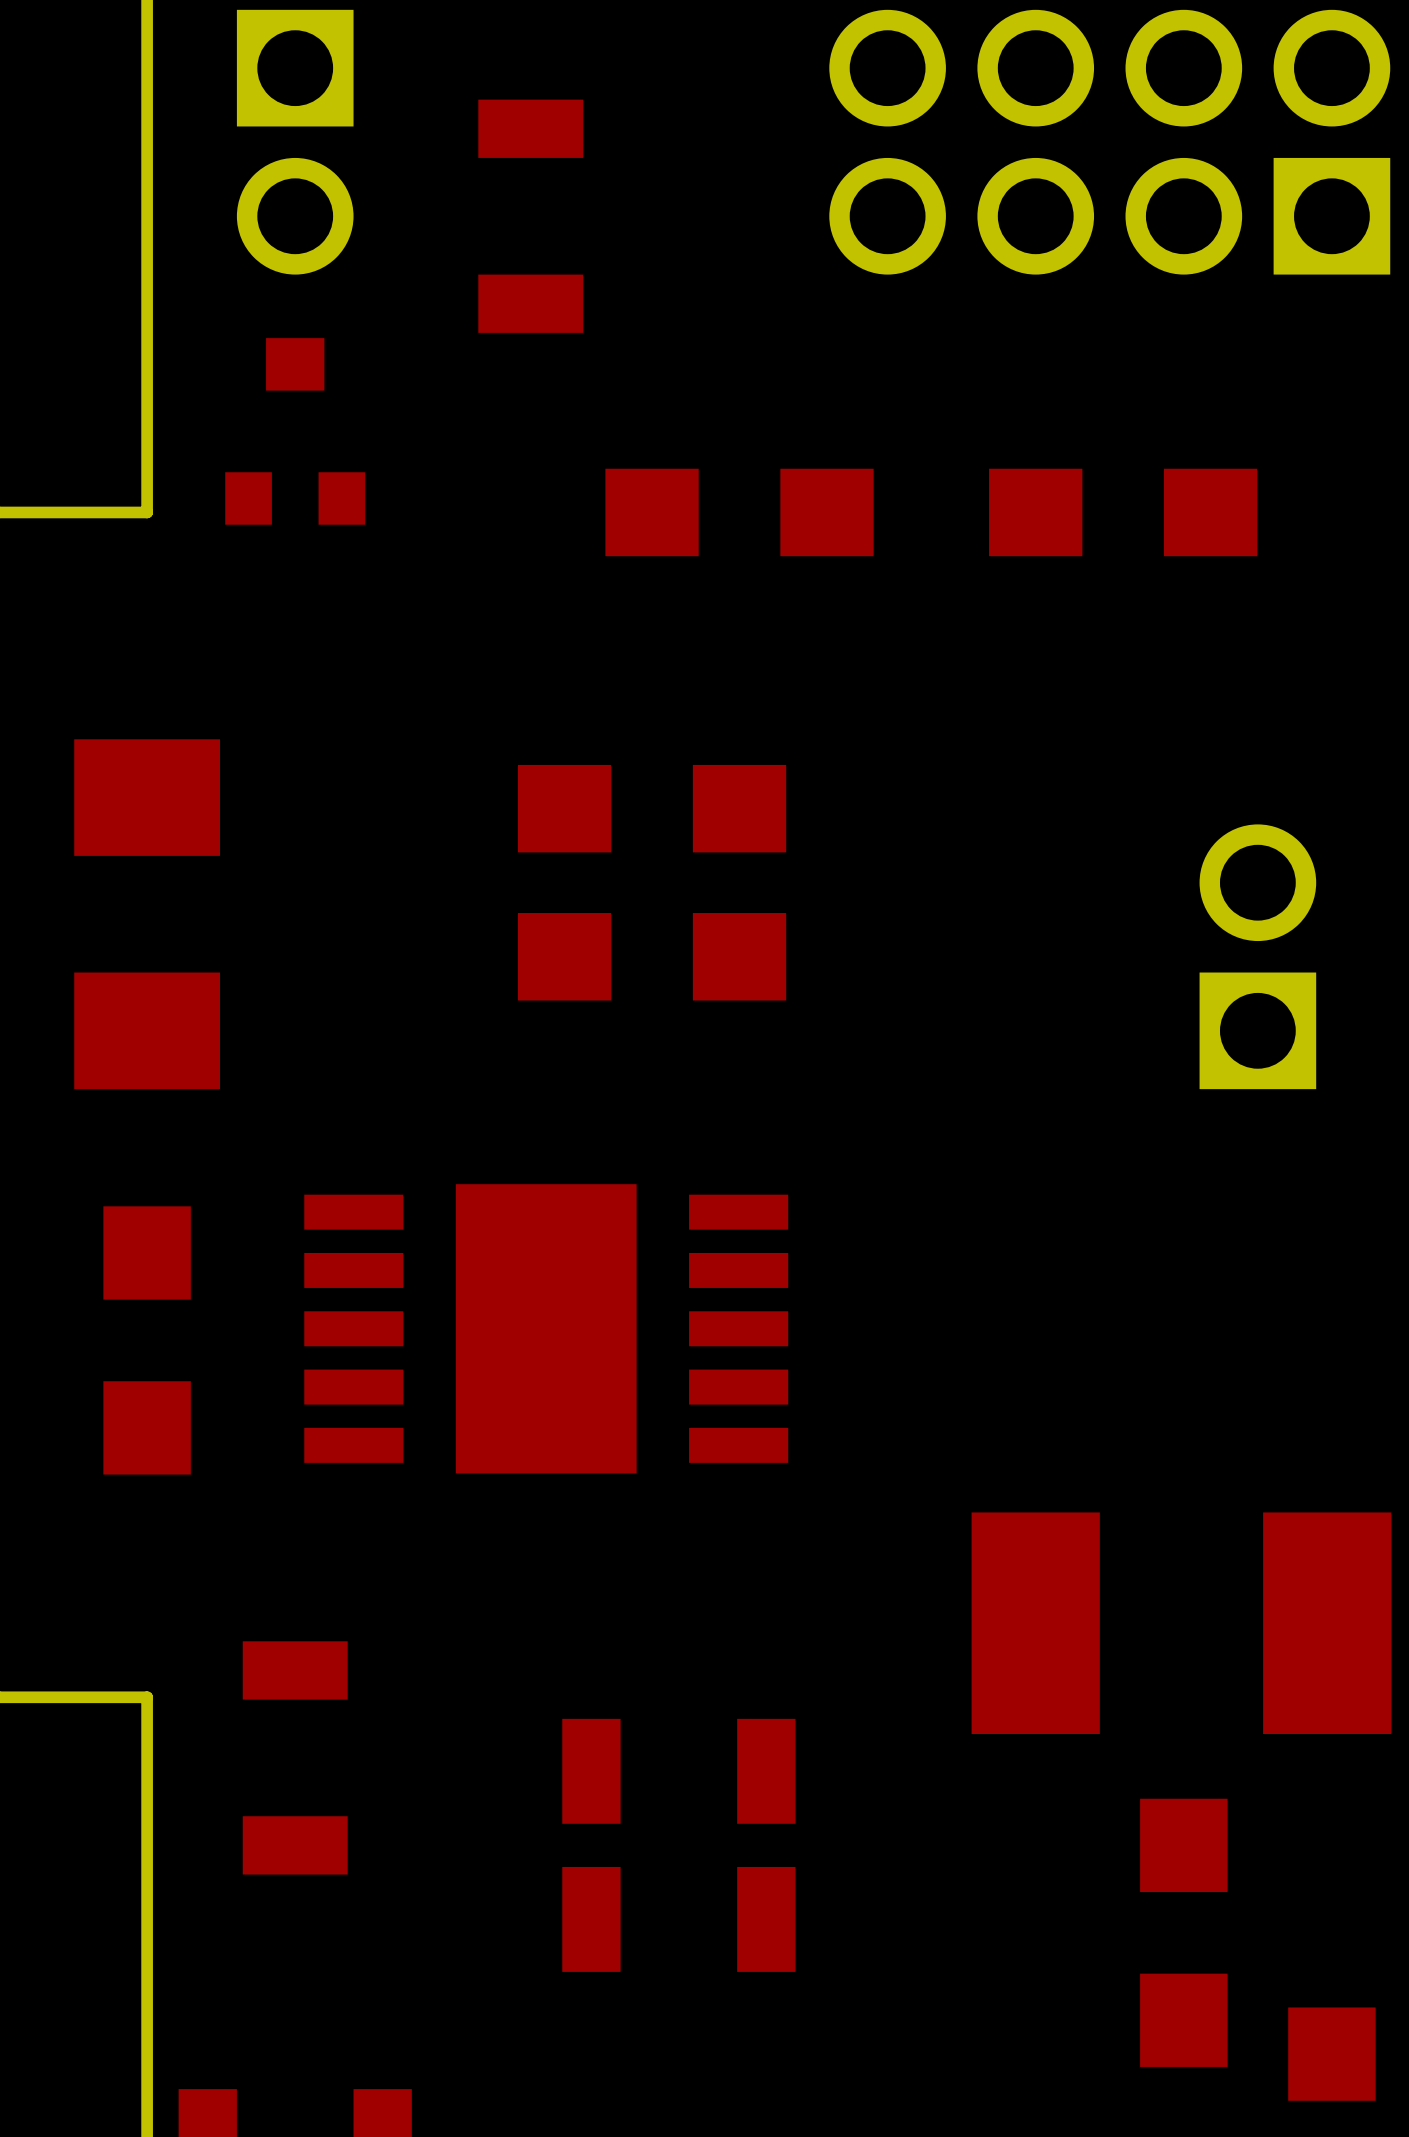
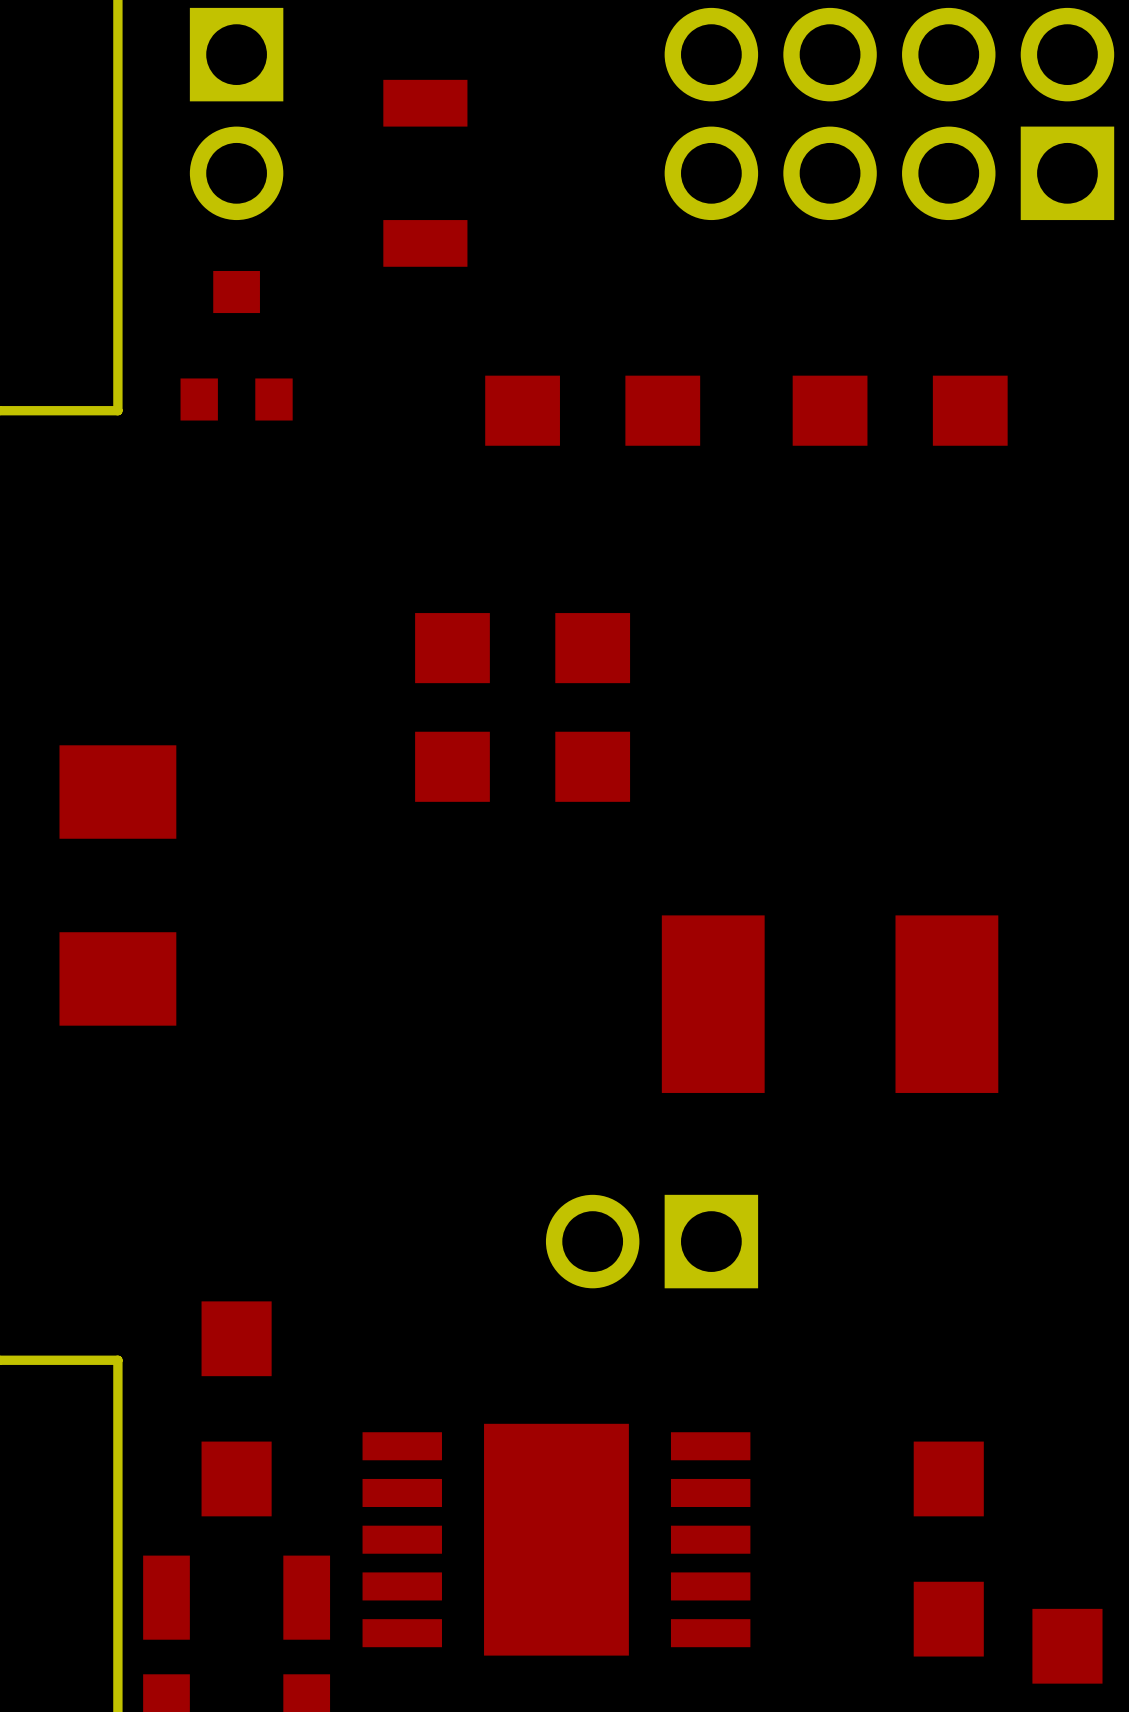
part position: (147, 914) -> (117, 885)
part rotation: 0° (1257, 956) -> 90° counterclockwise (652, 1241)
part position: (1257, 956) -> (652, 1241)
part: (546, 1328) -> none
part: (147, 1340) -> none
part position: (1181, 1623) -> (830, 1004)
part footprint: [242, 1641, 348, 1875] -> [201, 1301, 272, 1517]
part: (678, 1771) -> none
part footprint: [562, 1866, 796, 1972] -> [362, 1423, 751, 1656]
part: none -> (236, 1597)

